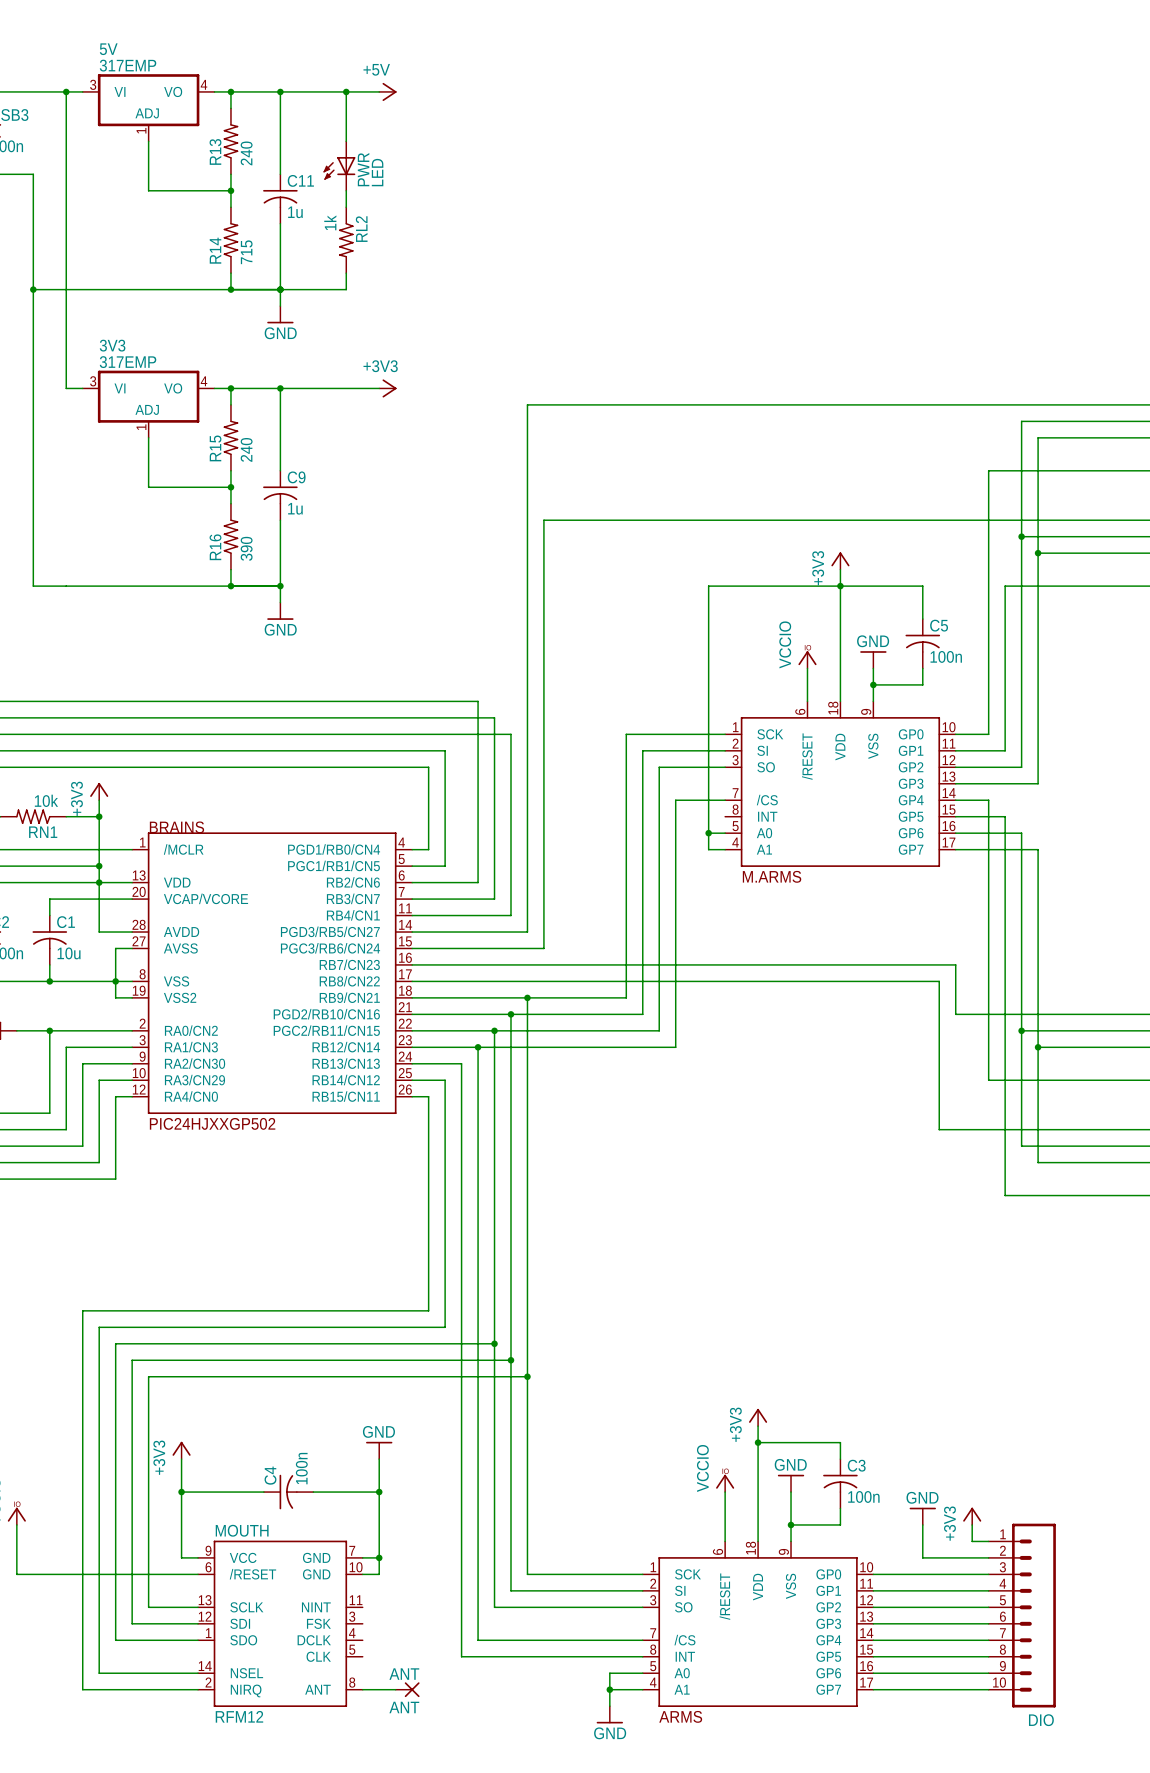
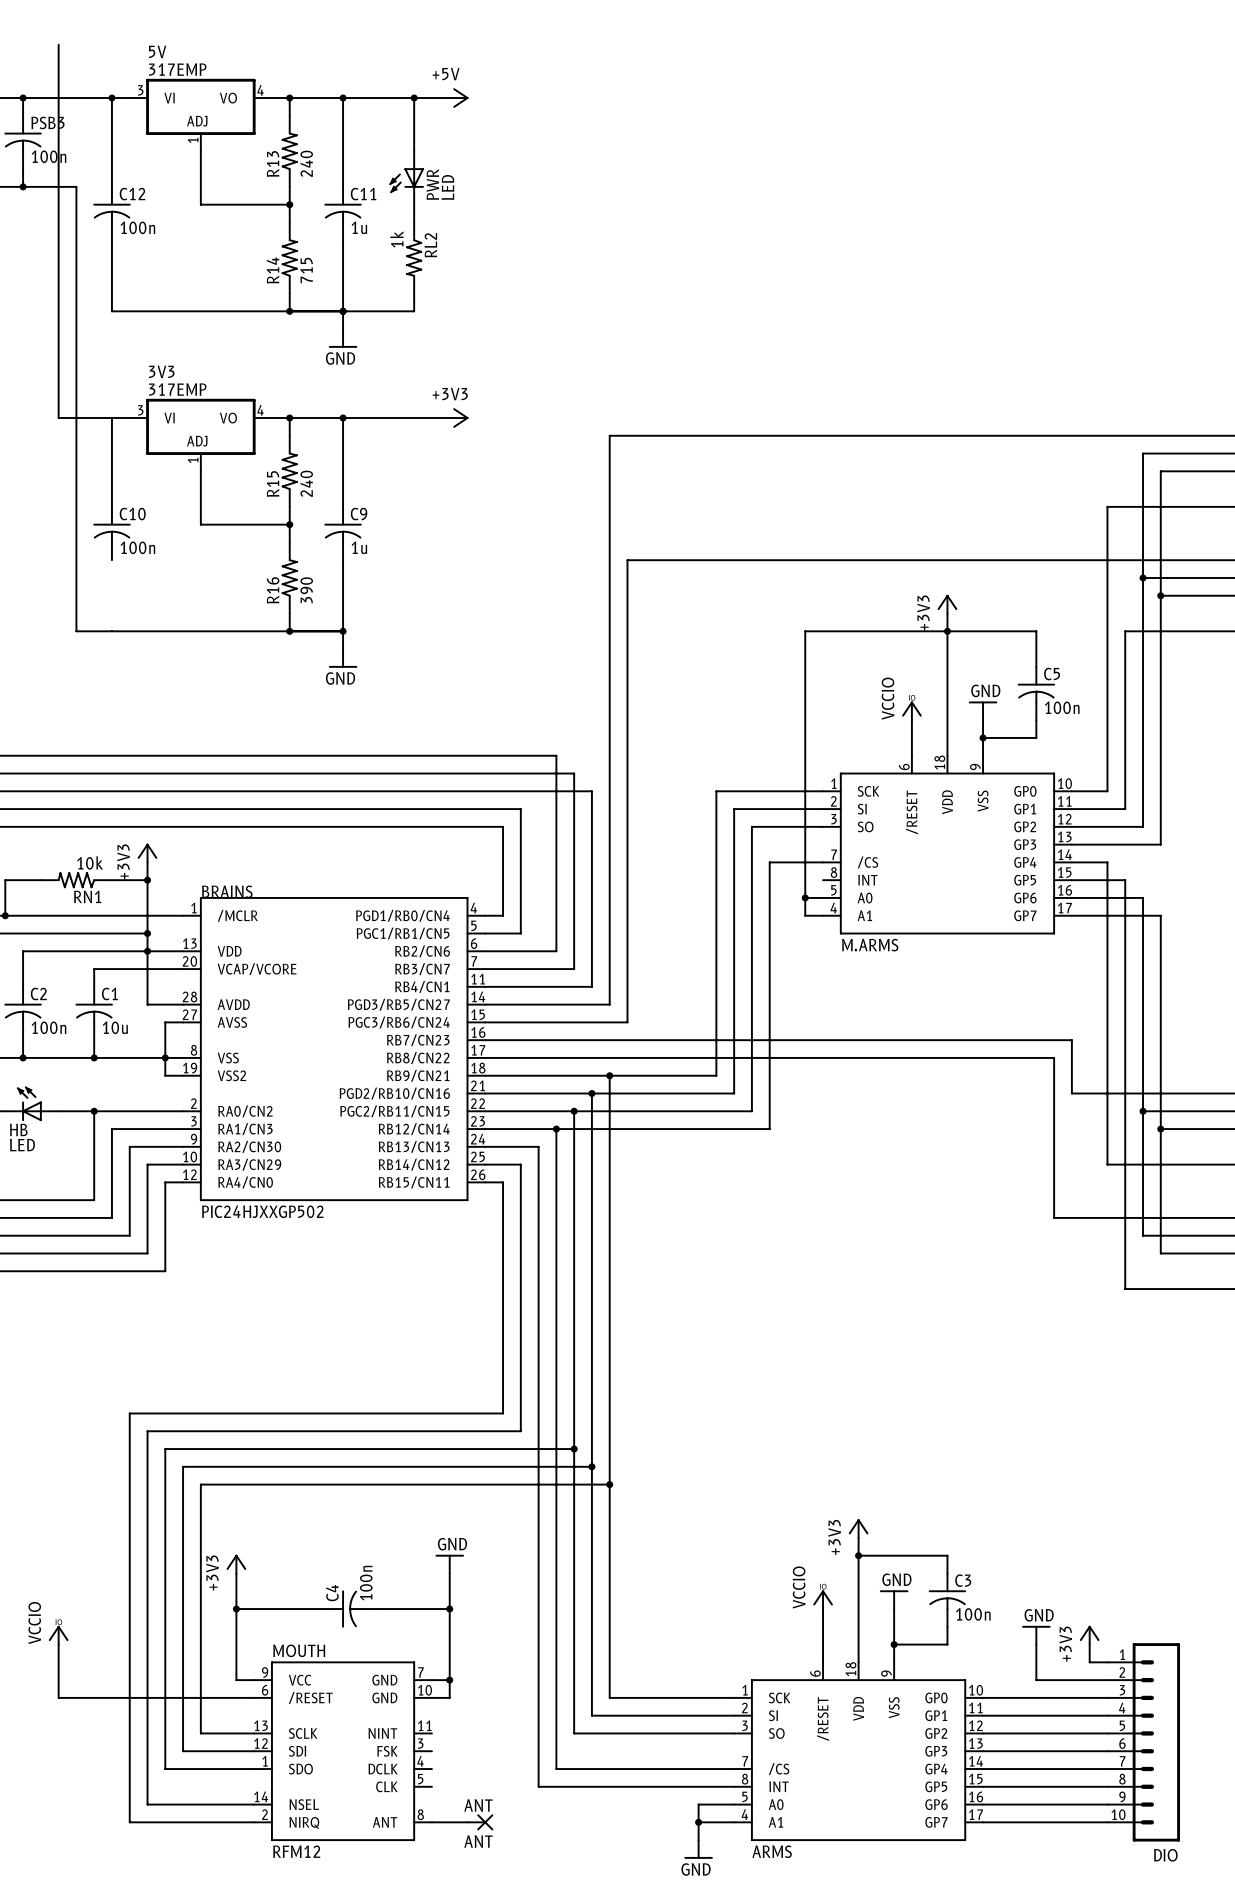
wire: none -> (58, 44) (58, 417) (111, 417) (111, 506)
C12: none -> 100n (111, 213)
wire: (33, 289) (66, 289) (66, 388) -> none
junction: (33, 289) -> none
C10: none -> 100n (111, 533)

